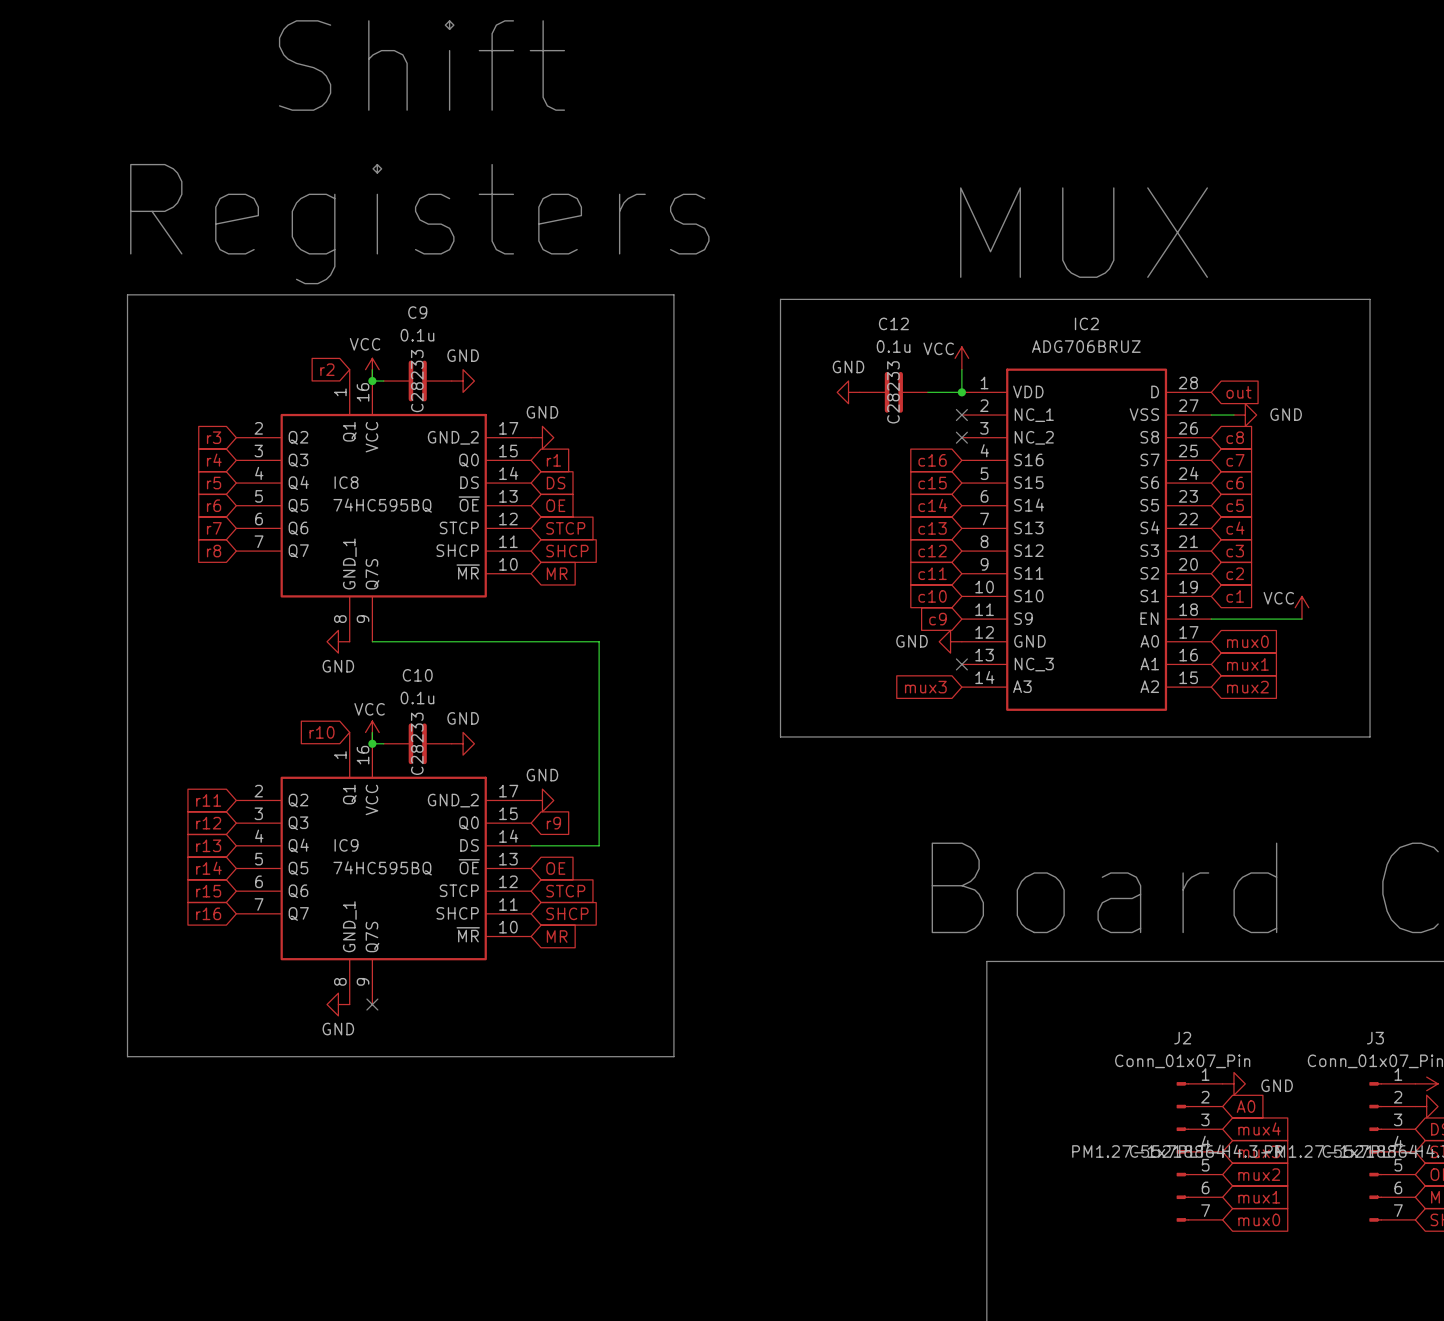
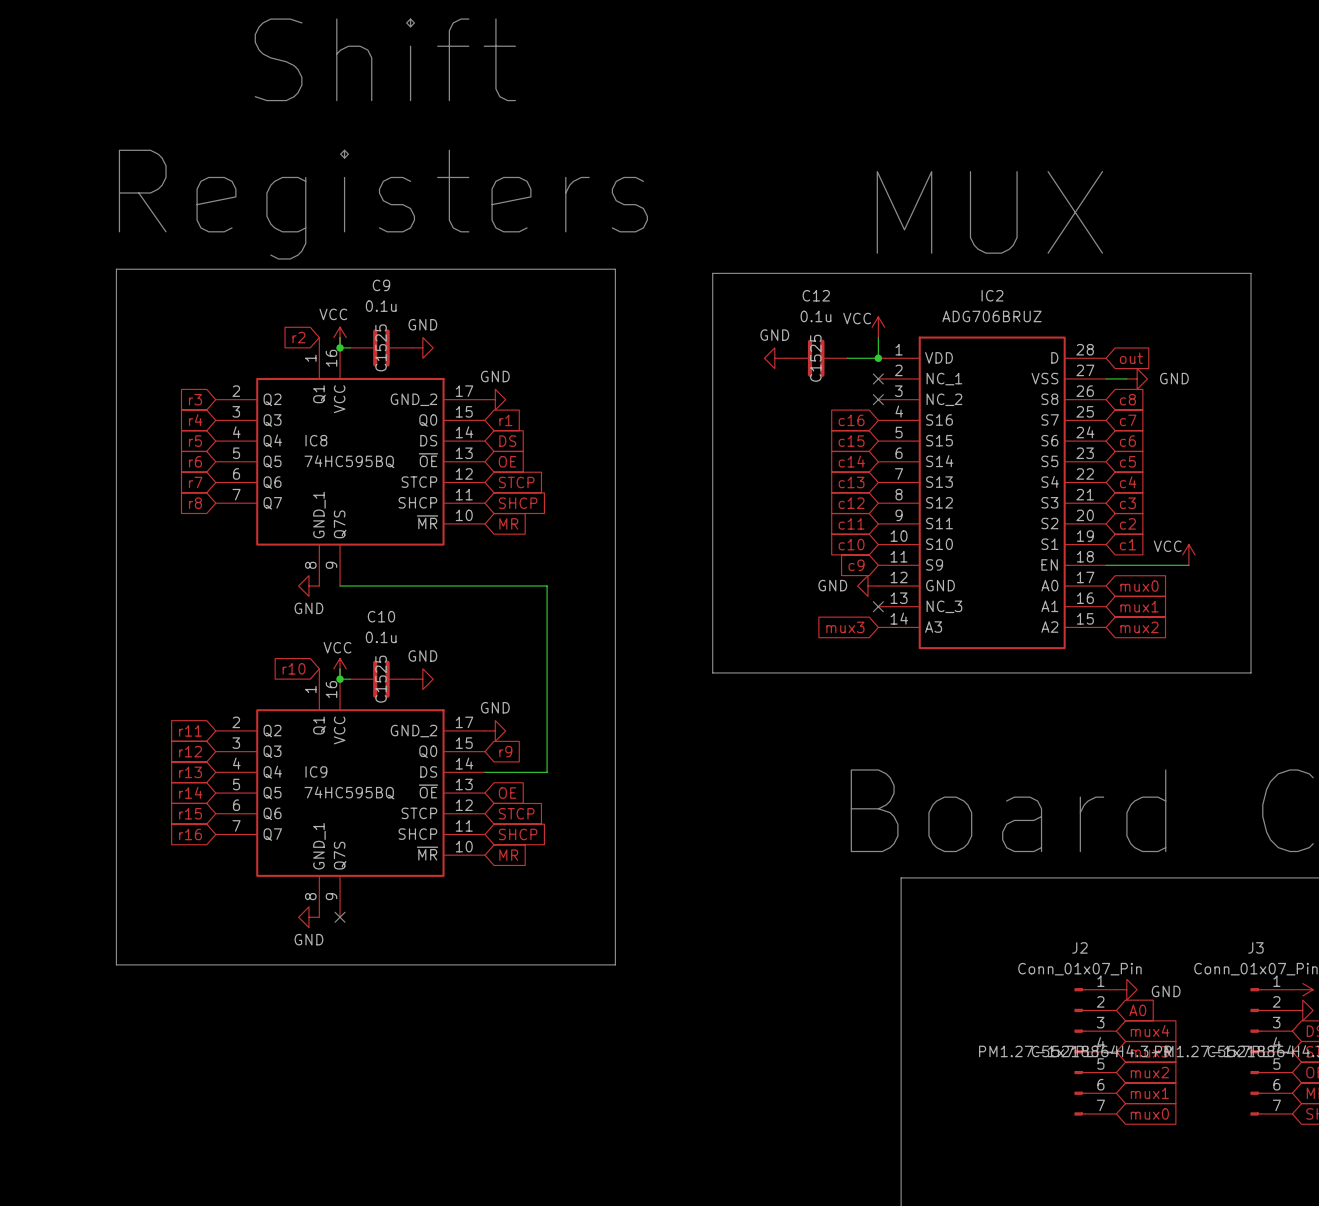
C9 text: C28233 (417, 381) -> C1525 (381, 347)
C12 text: C28233 (893, 392) -> C1525 (815, 358)
C10 text: C28233 (417, 743) -> C1525 (381, 679)

